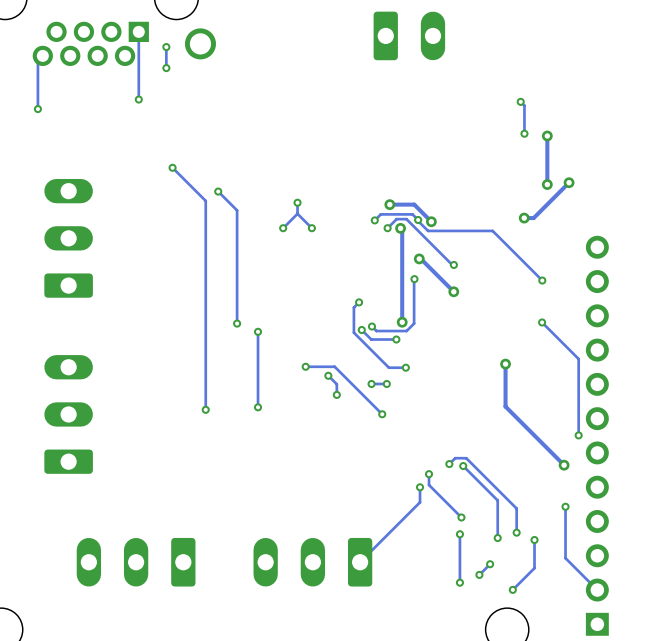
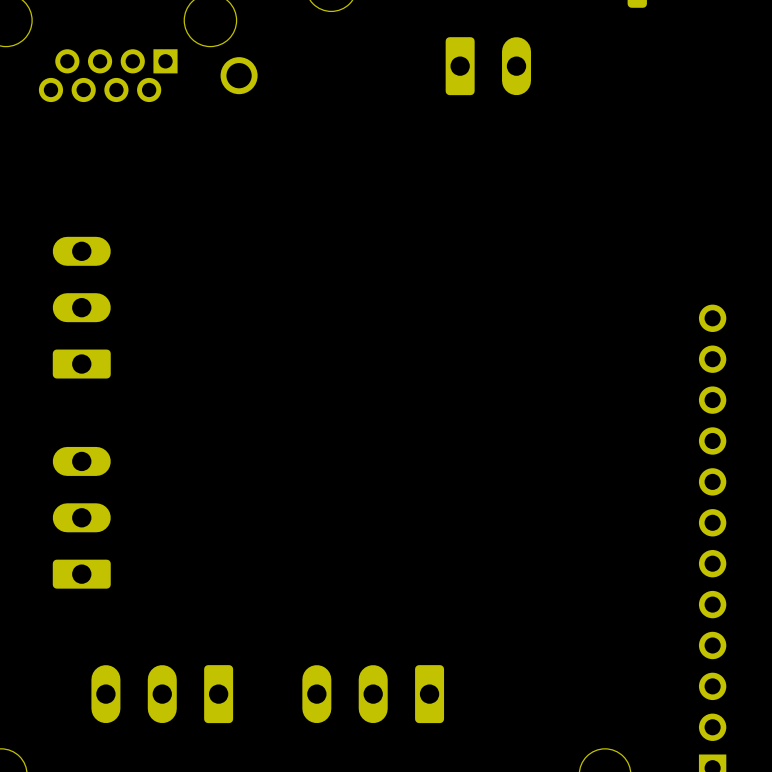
track: (138, 31) (138, 99) -> none
track: (166, 47) (166, 68) -> none
via: (166, 47) -> none
track: (42, 55) (37, 60) (37, 109) -> none
via: (166, 68) -> none
via: (138, 99) -> none
track: (520, 101) (524, 105) (524, 133) -> none
via: (520, 101) -> none
via: (37, 109) -> none
via: (524, 133) -> none
track: (547, 135) (547, 184) -> none
via: (547, 135) -> none
track: (172, 167) (205, 200) (205, 409) -> none
via: (172, 167) -> none
track: (569, 182) (533, 218) (524, 218) -> none
via: (569, 182) -> none
via: (547, 184) -> none
track: (218, 191) (237, 210) (237, 323) -> none
via: (218, 191) -> none
track: (297, 202) (297, 213) -> none
via: (297, 202) -> none
track: (389, 204) (414, 204) (431, 221) -> none
via: (389, 204) -> none
track: (297, 213) (311, 228) -> none
track: (297, 213) (283, 228) -> none
via: (524, 218) -> none
via: (418, 219) -> none
track: (374, 220) (380, 214) (412, 214) (428, 230) (492, 230) (542, 280) -> none
via: (374, 220) -> none
via: (431, 221) -> none
via: (283, 228) -> none
via: (311, 228) -> none
track: (387, 228) (396, 219) (406, 219) (453, 264) -> none
via: (387, 228) -> none
track: (400, 228) (402, 230) (402, 322) -> none
via: (400, 228) -> none
track: (419, 258) (453, 291) -> none
via: (419, 258) -> none
via: (453, 264) -> none
track: (414, 279) (414, 323) (406, 331) (376, 331) (371, 326) -> none
via: (414, 279) -> none
via: (542, 280) -> none
via: (453, 291) -> none
track: (359, 302) (353, 307) (353, 332) (388, 367) (405, 367) -> none
via: (359, 302) -> none
via: (402, 322) -> none
track: (542, 322) (578, 359) (578, 435) -> none
via: (542, 322) -> none
via: (237, 323) -> none
via: (371, 326) -> none
track: (361, 330) (371, 339) (396, 339) -> none
via: (361, 330) -> none
track: (258, 331) (258, 407) -> none
via: (258, 331) -> none
via: (396, 339) -> none
track: (505, 364) (505, 406) (564, 465) -> none
via: (505, 364) -> none
track: (305, 366) (334, 366) (382, 414) -> none
via: (305, 366) -> none
via: (405, 367) -> none
track: (328, 375) (336, 384) (336, 394) -> none
via: (328, 375) -> none
via: (371, 383) -> none
track: (386, 383) (371, 383) -> none
via: (386, 383) -> none
via: (336, 394) -> none
via: (258, 407) -> none
via: (205, 409) -> none
via: (382, 414) -> none
via: (578, 435) -> none
track: (449, 464) (455, 458) (466, 458) (516, 508) (516, 532) -> none
via: (449, 464) -> none
via: (564, 465) -> none
track: (463, 466) (497, 500) (497, 538) -> none
via: (463, 466) -> none
track: (429, 474) (429, 485) (461, 517) -> none
via: (429, 474) -> none
track: (420, 487) (420, 502) (360, 562) -> none
via: (420, 487) -> none
track: (565, 506) (565, 558) (597, 590) -> none
via: (565, 506) -> none
via: (461, 517) -> none
via: (516, 532) -> none
track: (459, 534) (459, 582) -> none
via: (459, 534) -> none
via: (497, 538) -> none
track: (534, 539) (534, 568) (512, 589) -> none
via: (534, 539) -> none
track: (490, 564) (479, 574) -> none
via: (490, 564) -> none
via: (479, 574) -> none
via: (459, 582) -> none
via: (512, 589) -> none

